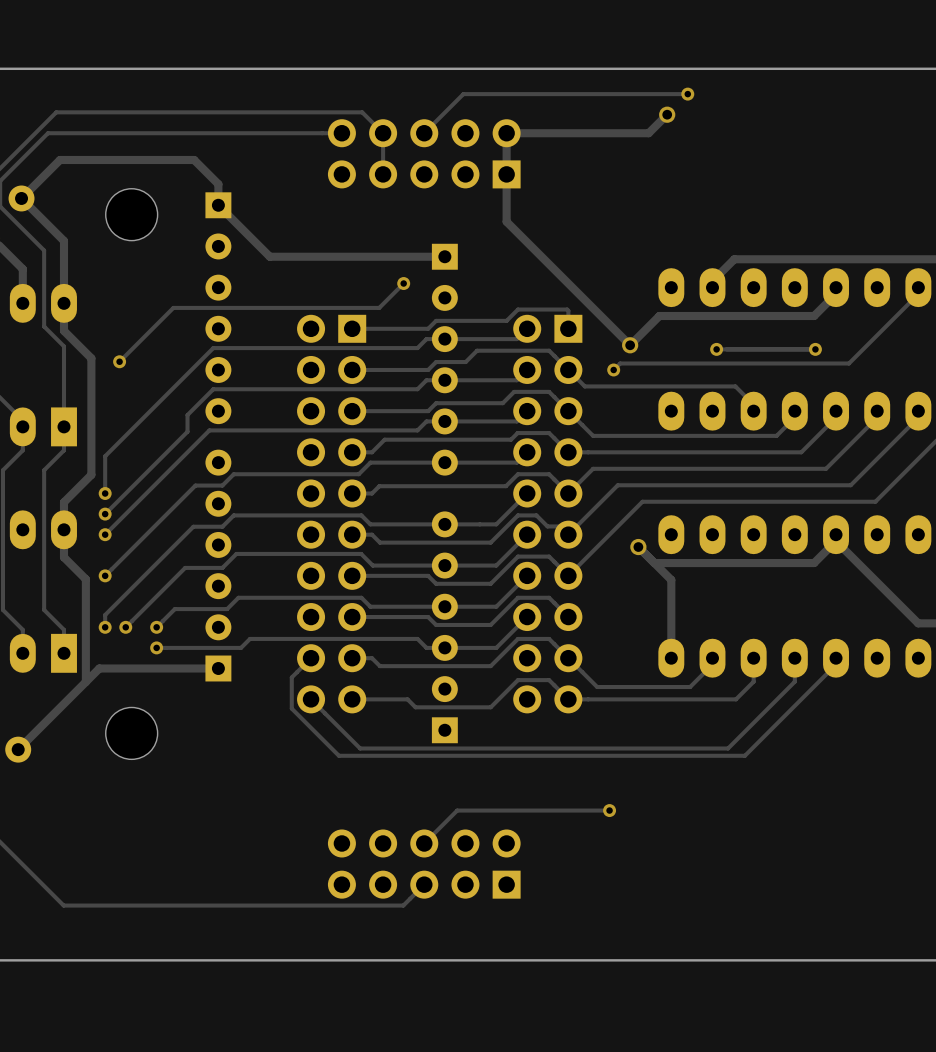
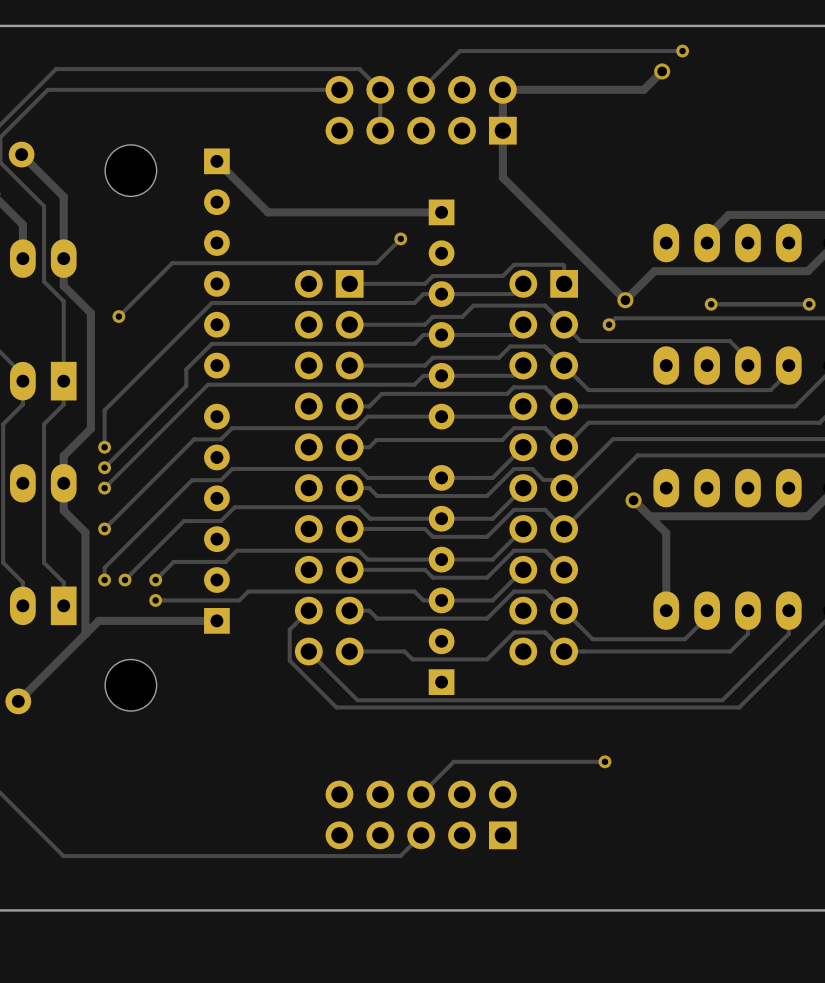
track: (21, 198) (60, 159) (194, 159) (218, 184) (218, 205) -> none

